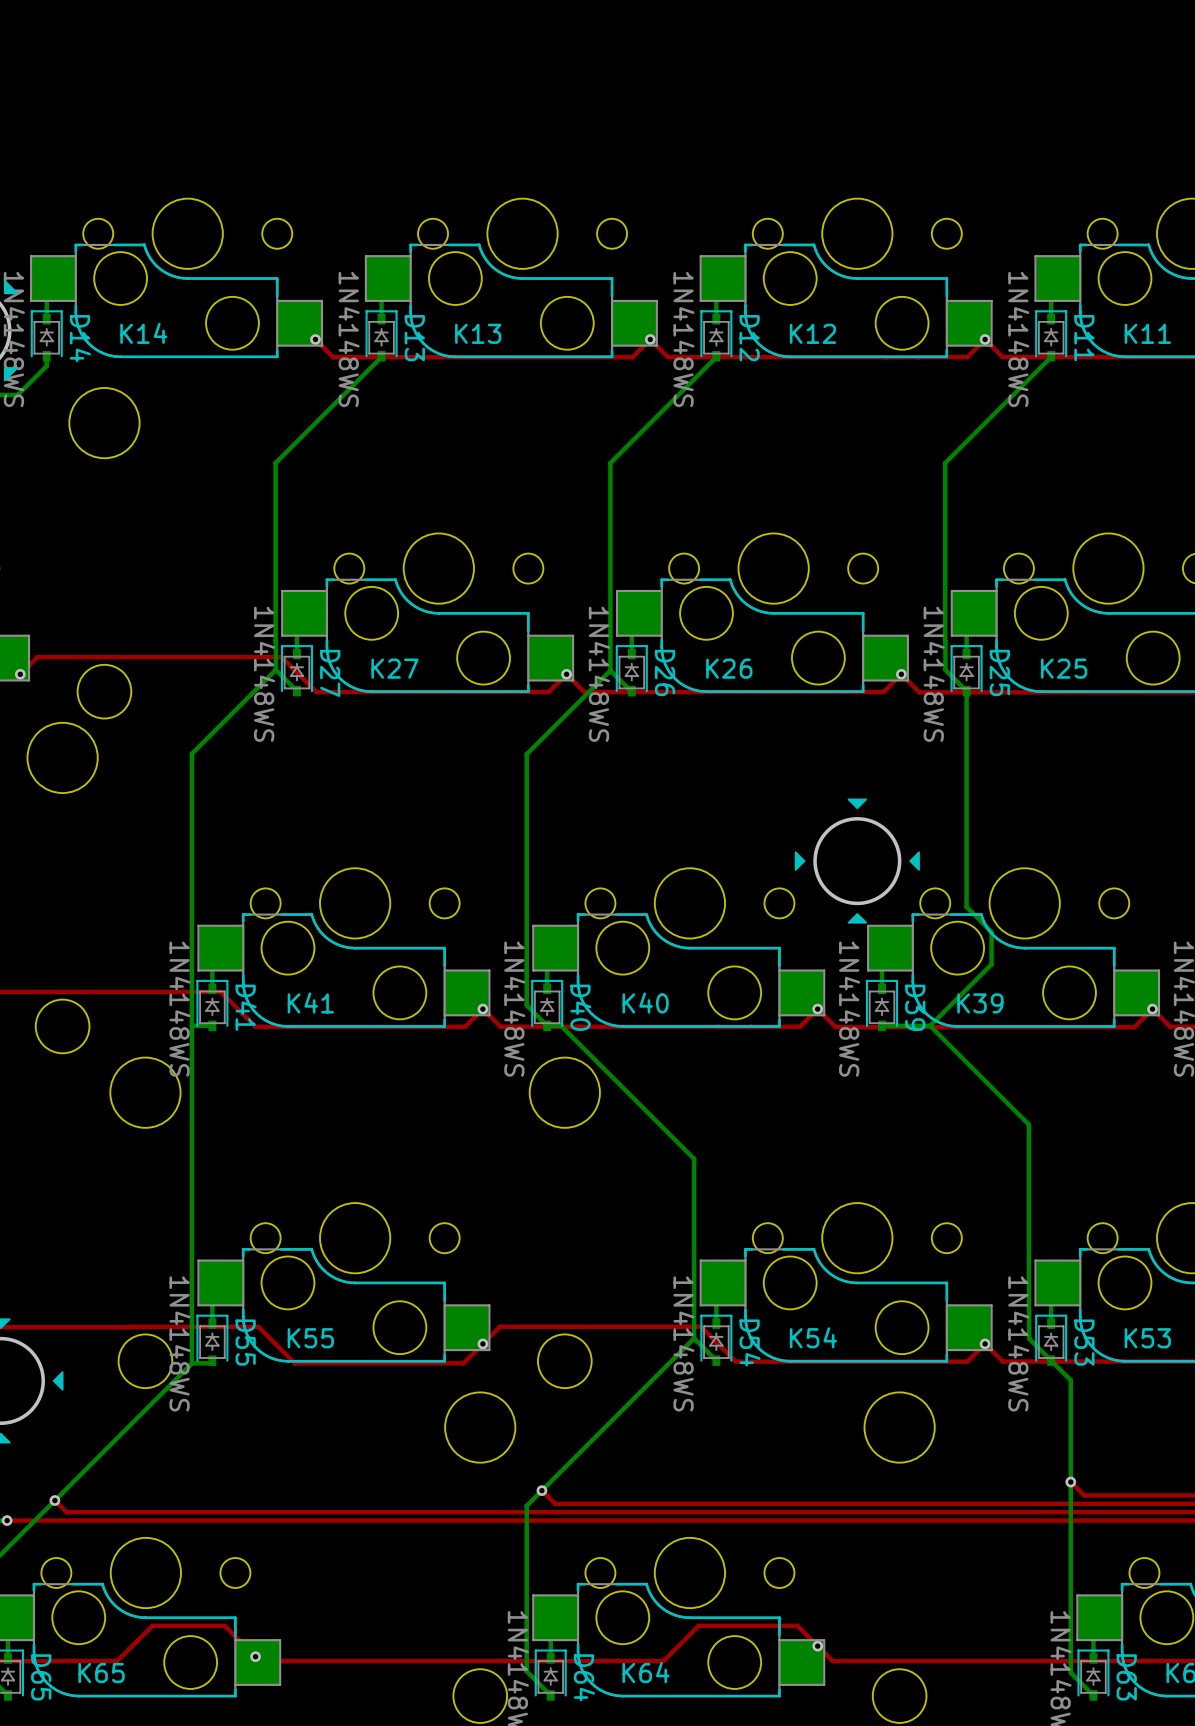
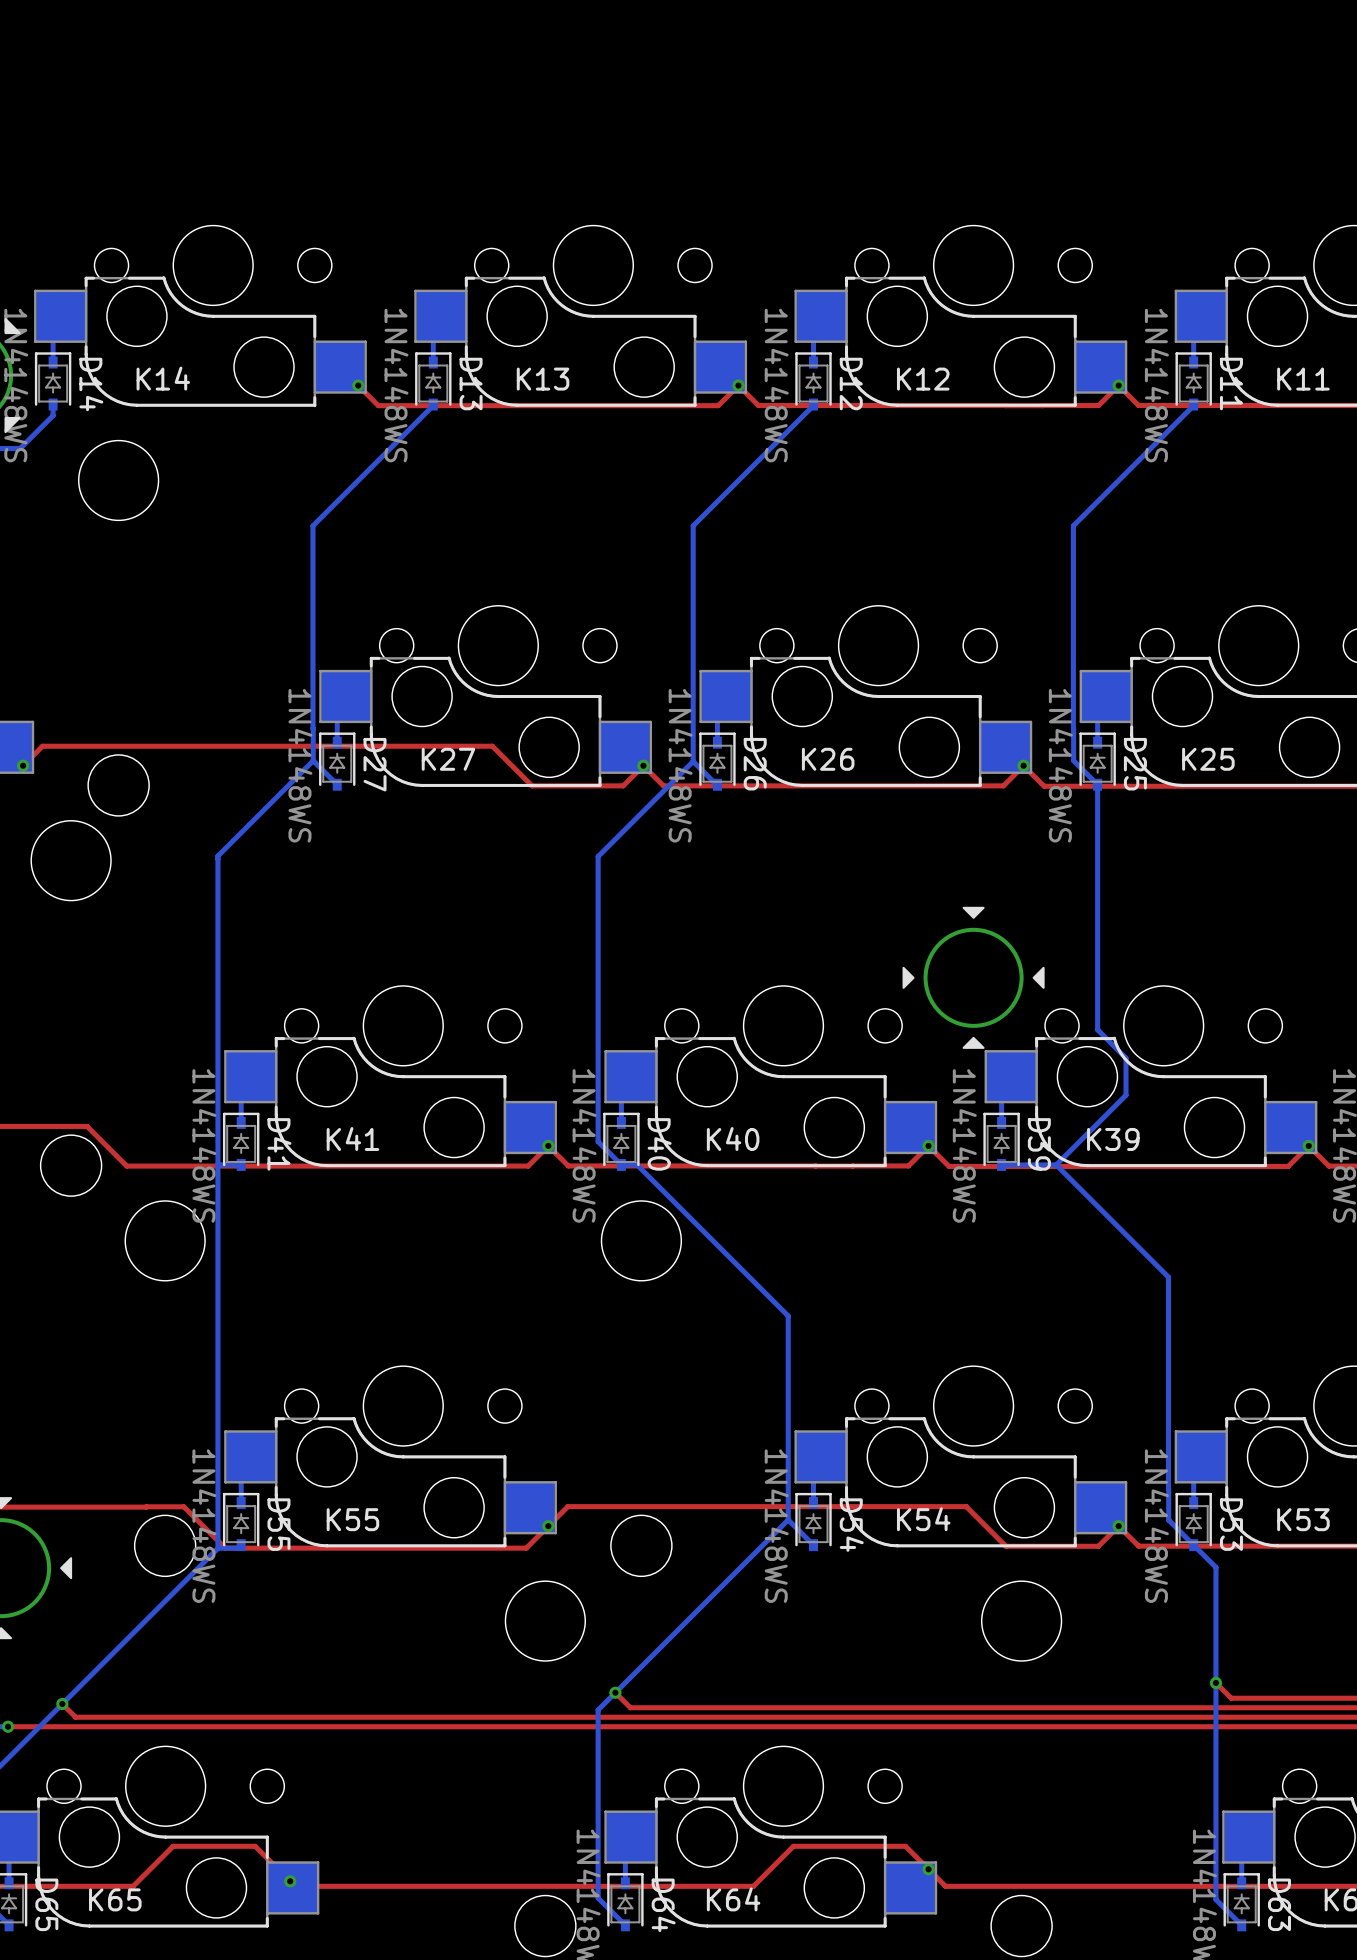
top track: (281, 657) (316, 692) (468, 692) -> (319, 746) (492, 746) (532, 785)
top track: (76, 991) (220, 991) (255, 1026) -> (87, 1126) (126, 1166) (290, 1166)
top track: (161, 1326) (258, 1326) (294, 1363) -> (183, 1506) (225, 1548) (334, 1548)
top track: (700, 1326) (735, 1361) (885, 1361) -> (795, 1506) (966, 1506) (1005, 1546)

